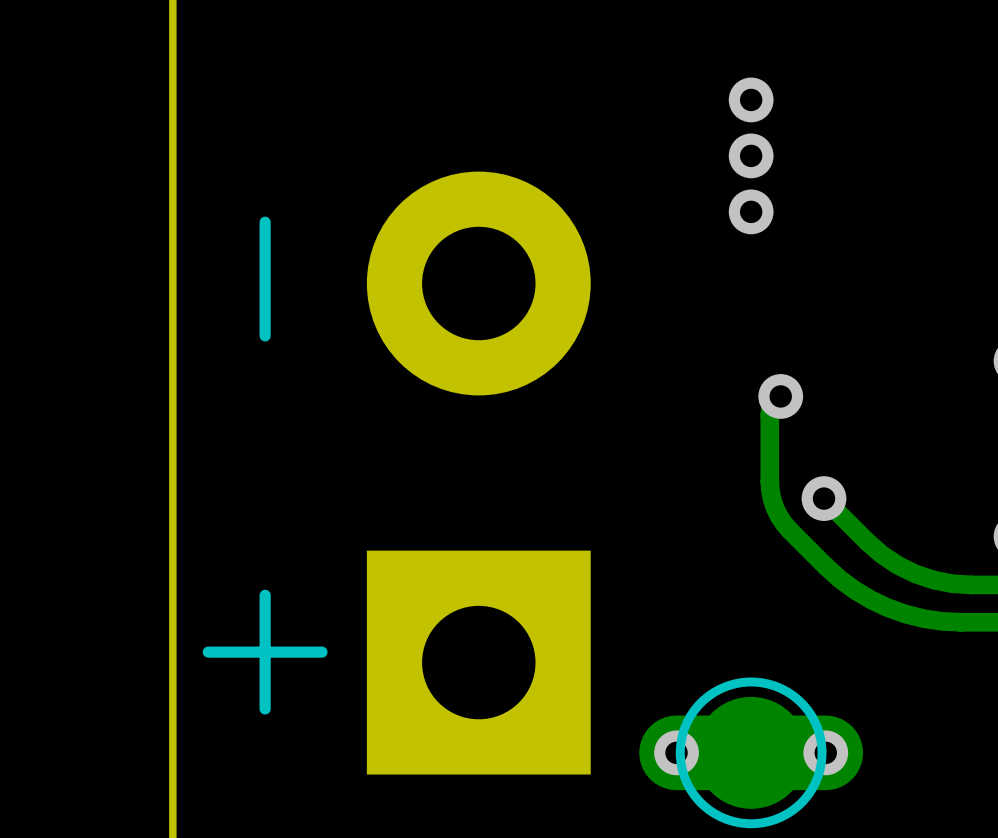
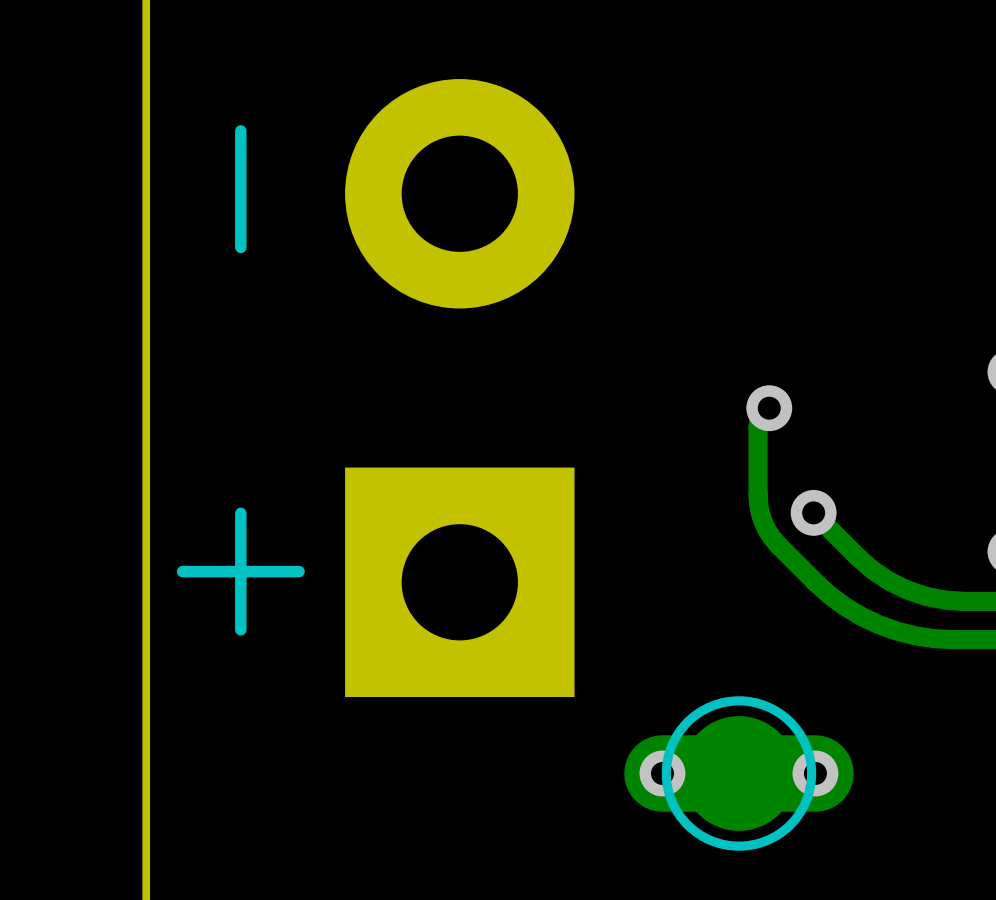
via: (751, 99) -> none
via: (751, 155) -> none
via: (751, 211) -> none
text position: - (265, 279) -> - (240, 189)
part position: (478, 473) -> (459, 388)
text position: + (265, 652) -> + (240, 571)

